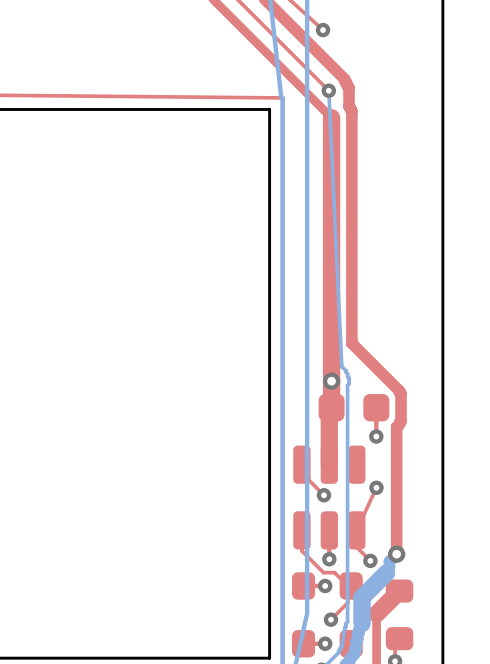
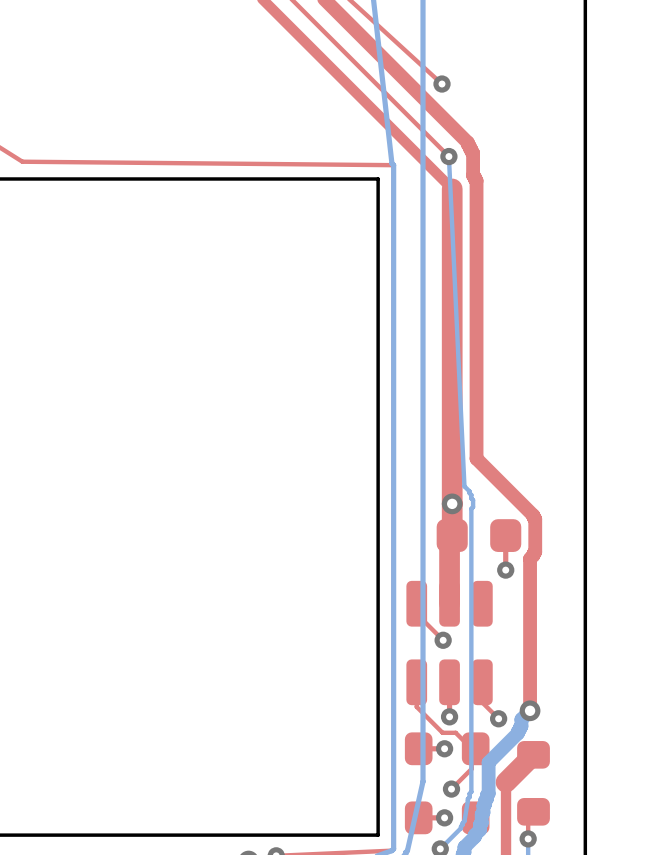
top track: (376, 487) (356, 530) -> none
via: (376, 487) -> none
bottom track width: thick (386, 572) (362, 597) (362, 623) -> thin (517, 733) (488, 762) (488, 793)

